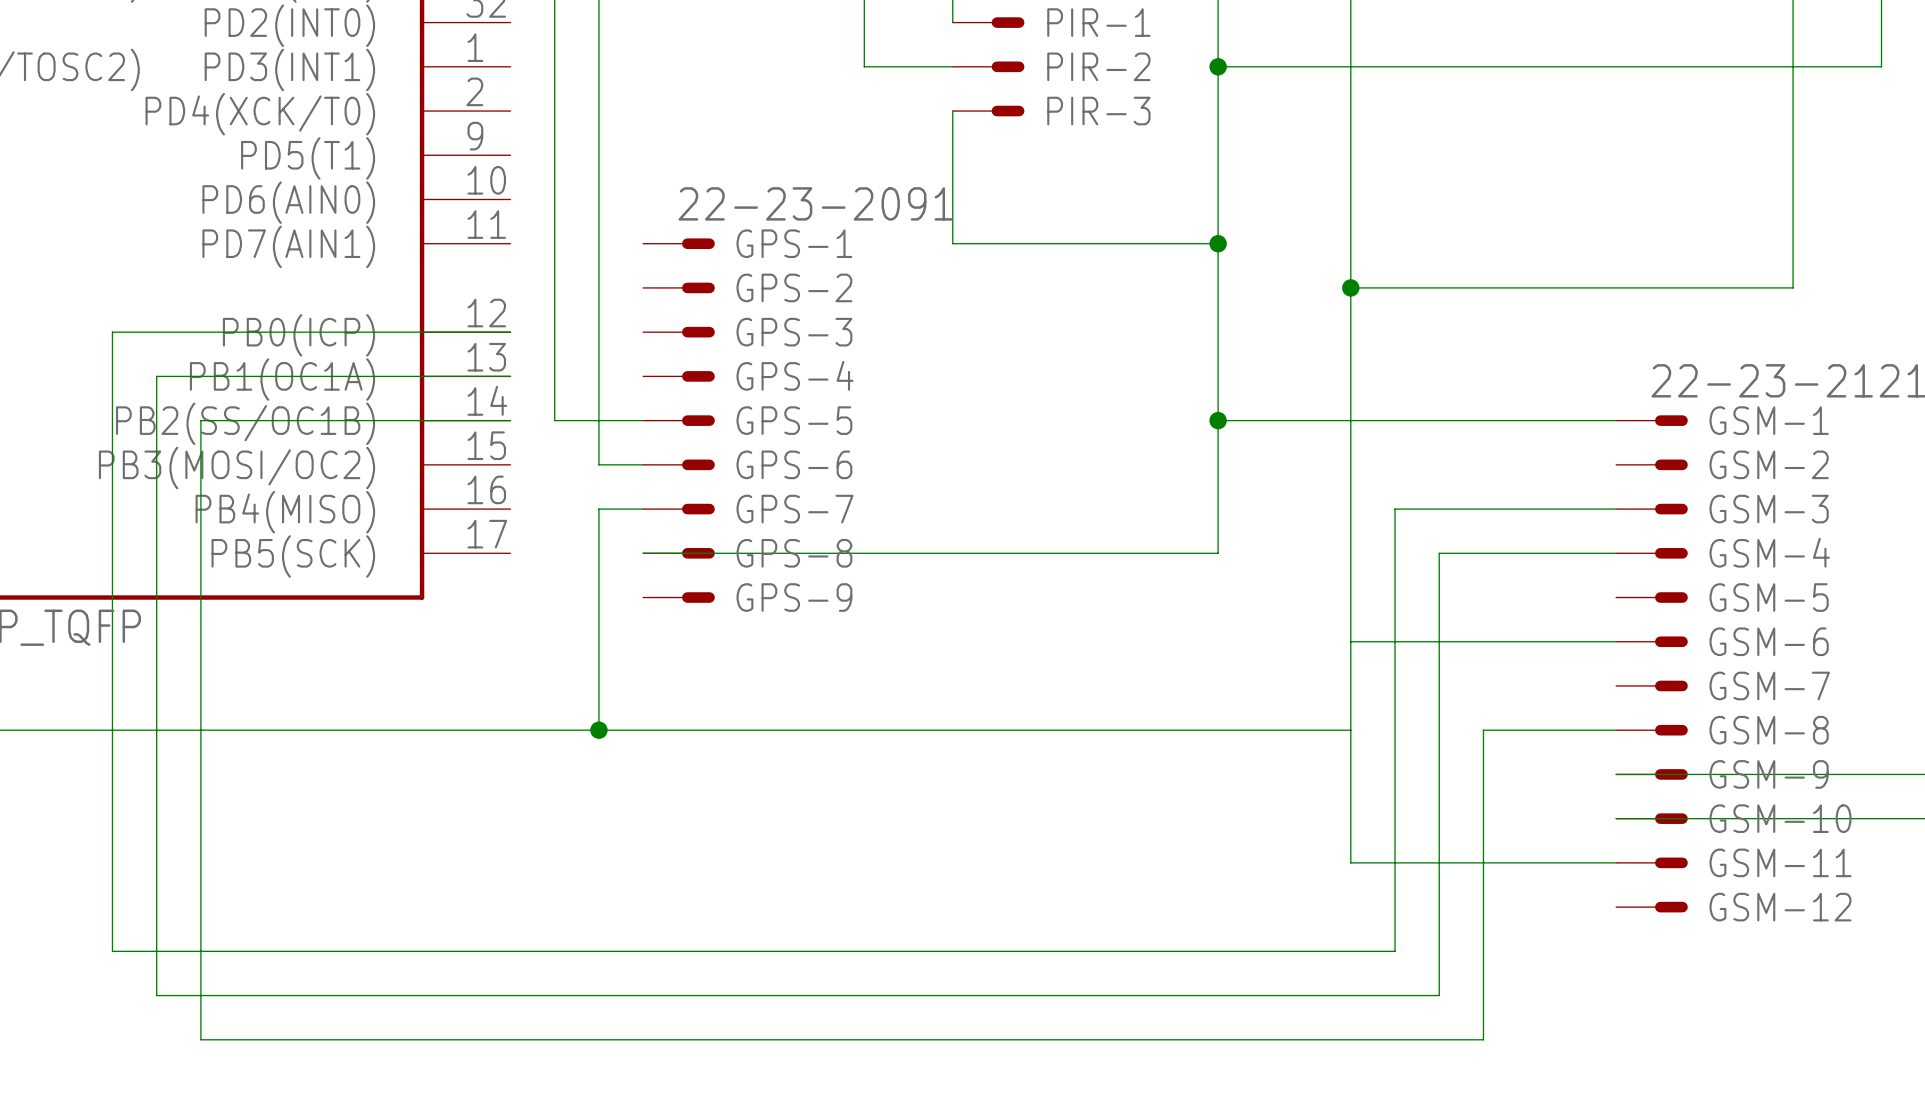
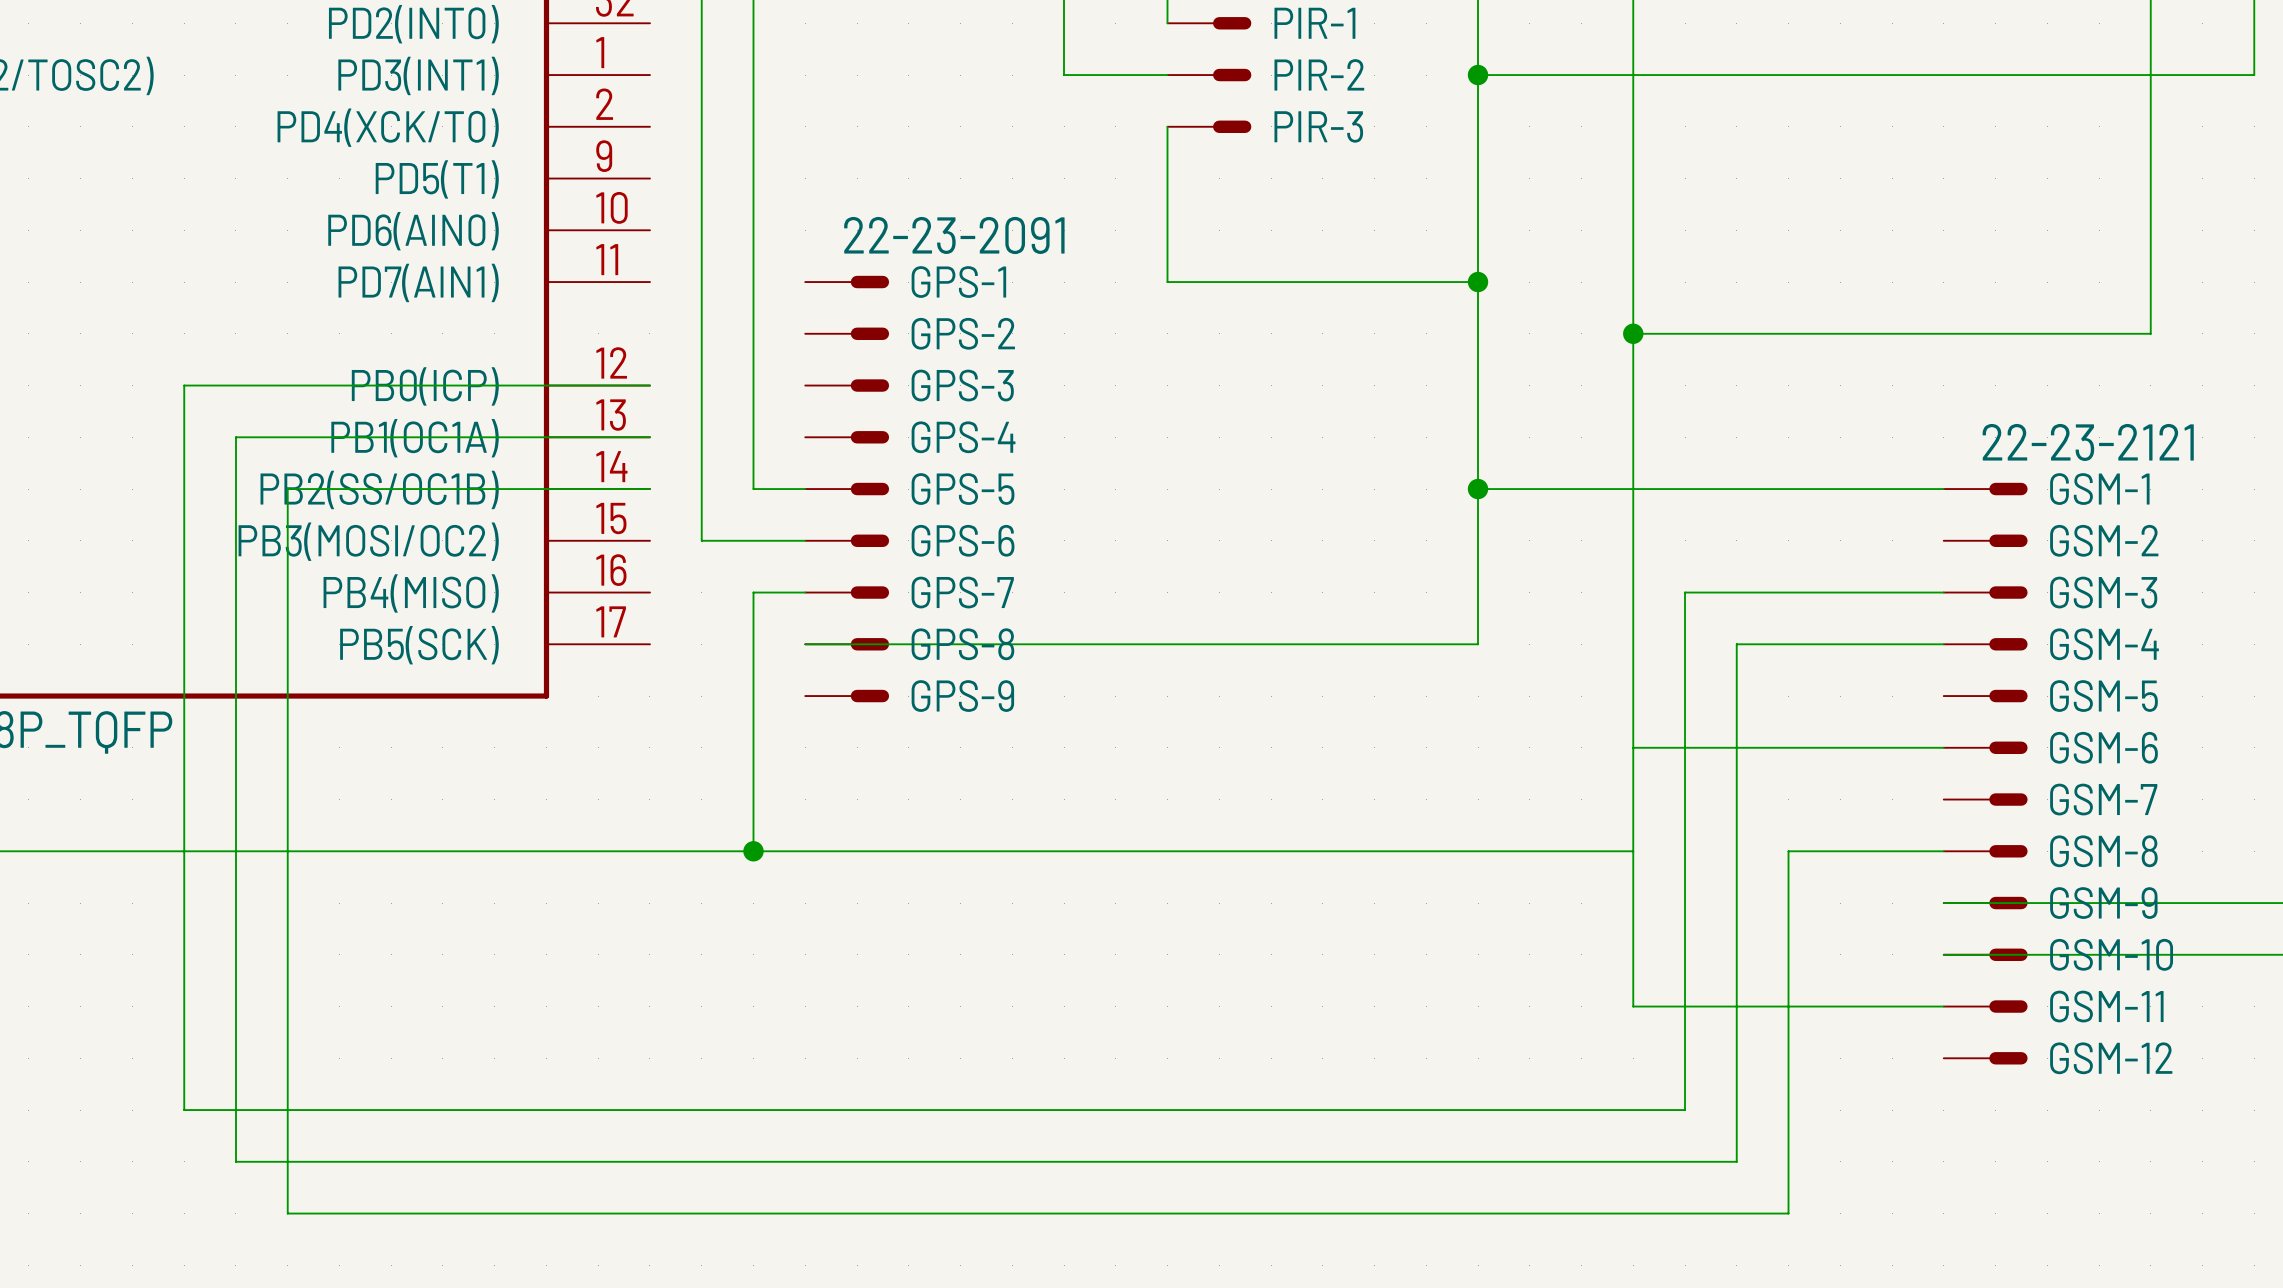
wire: (554, 420) (598, 420) (598, 464) -> (701, 489) (701, 540) (753, 540)

